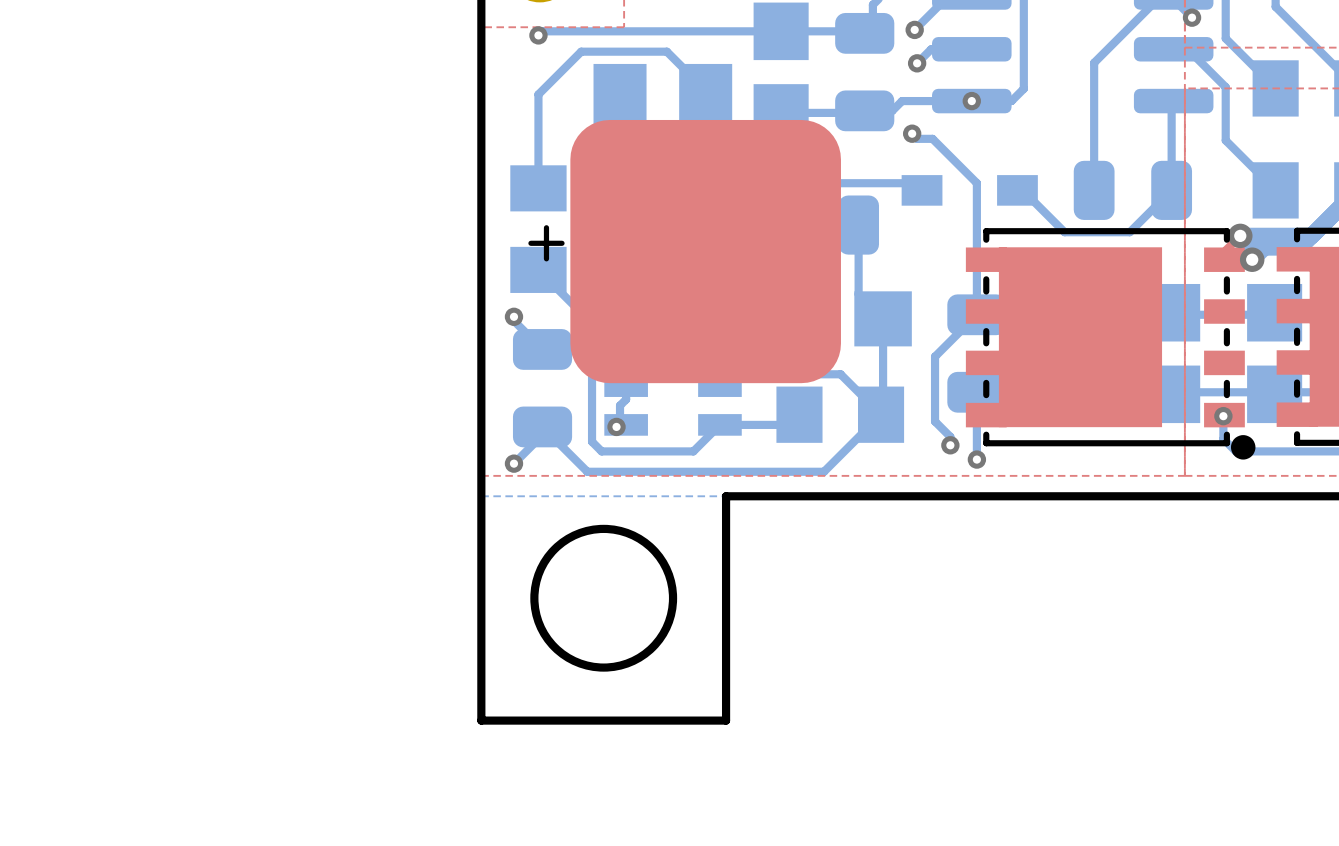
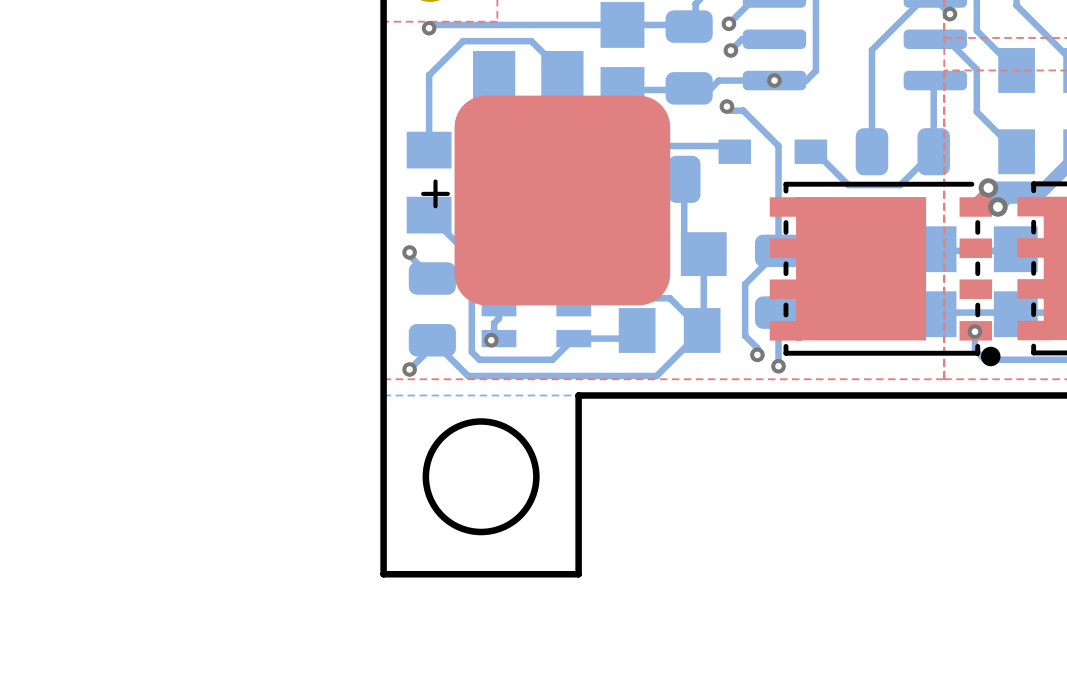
part footprint: [965, 228, 1256, 460] -> [769, 181, 1001, 367]

